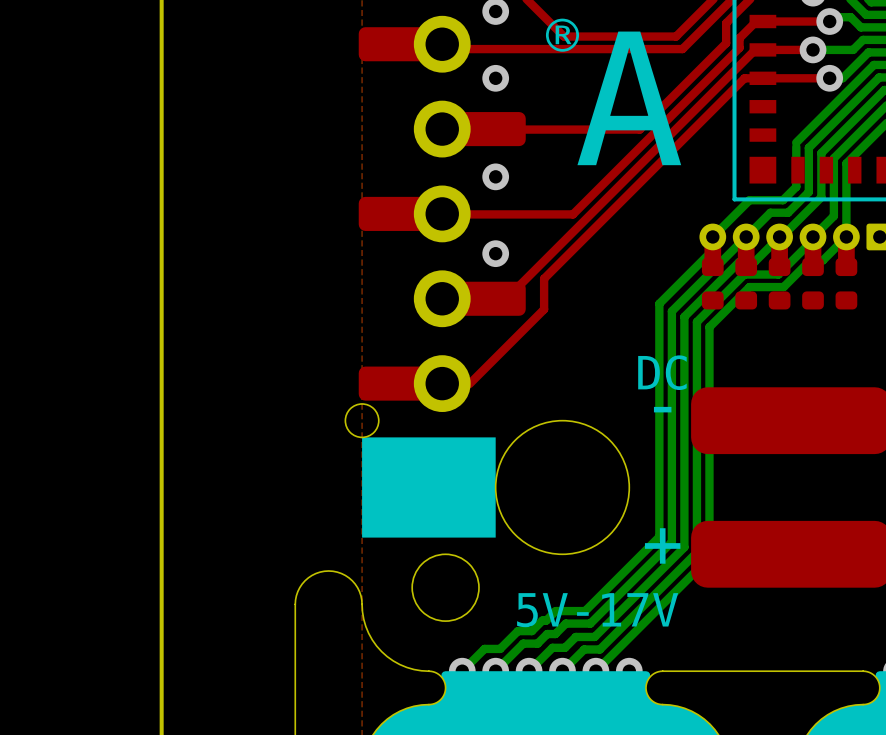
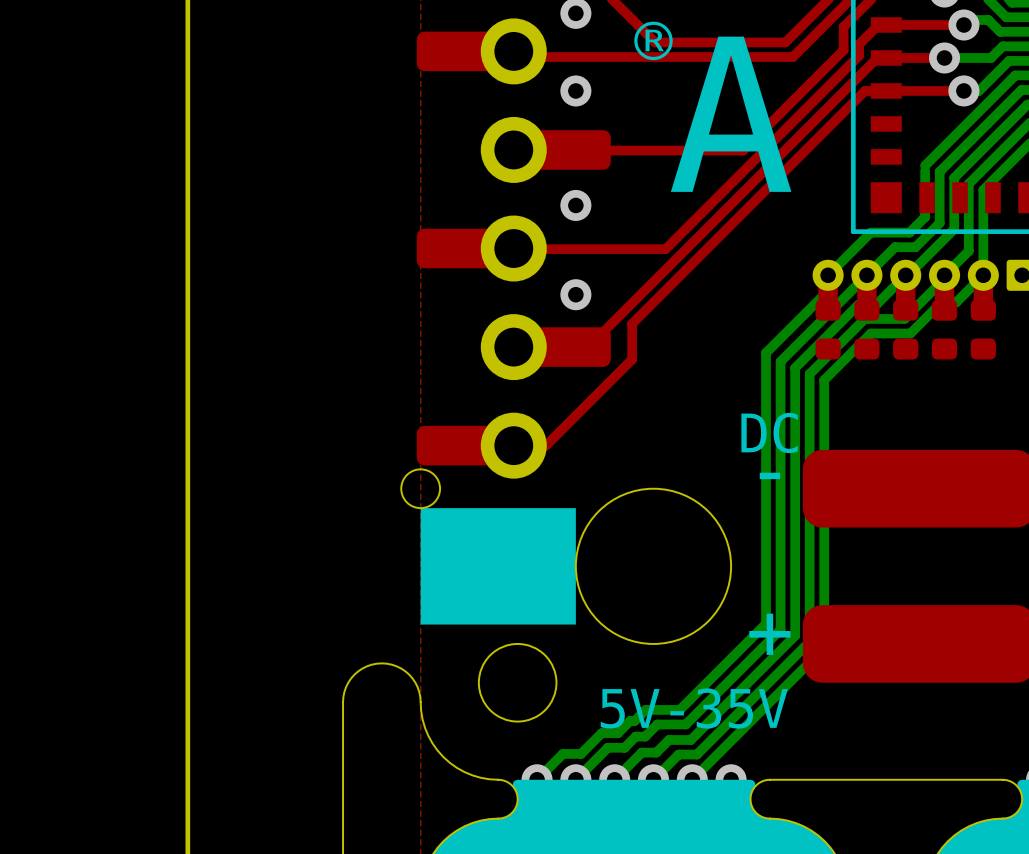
text: 5V-17V (597, 610) -> 5V-35V (694, 708)

